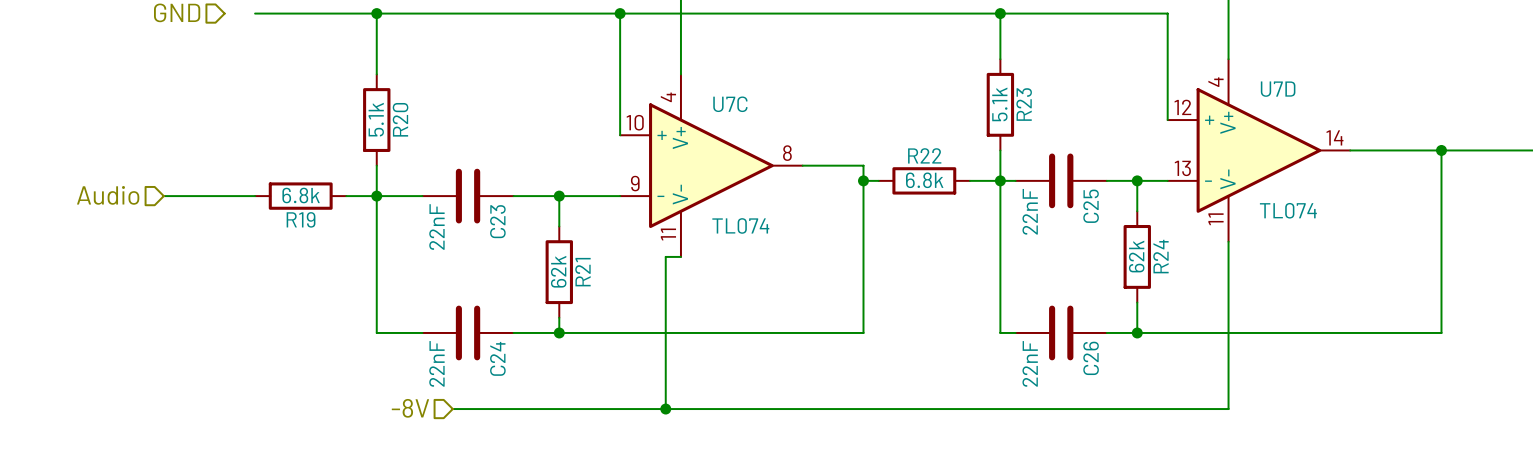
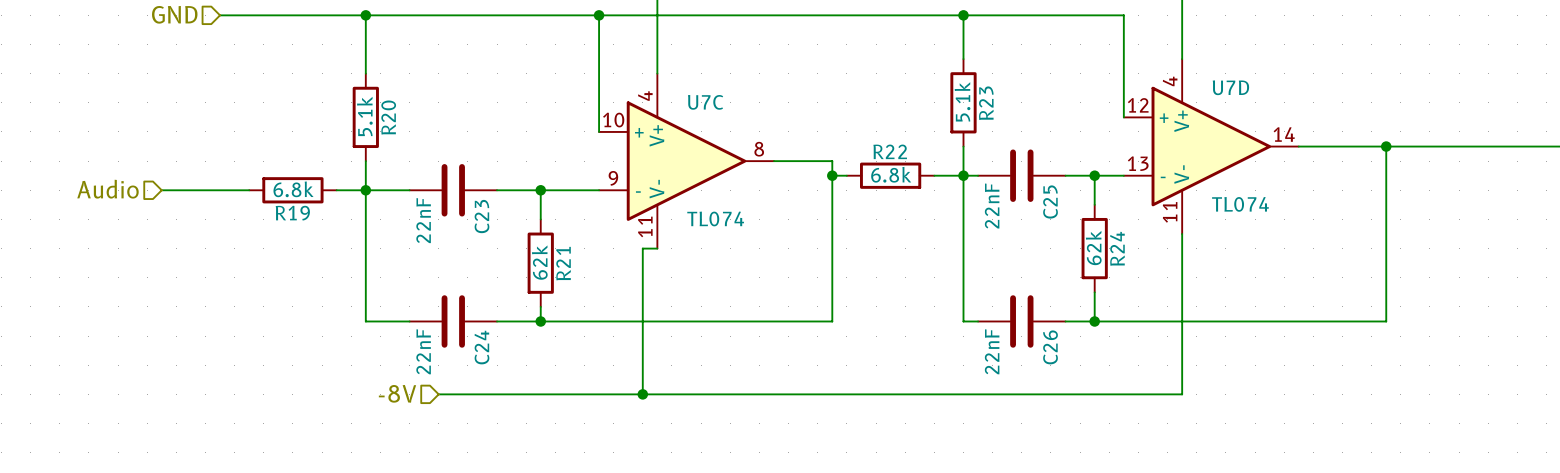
wire: none -> (220, 15) (249, 15)

